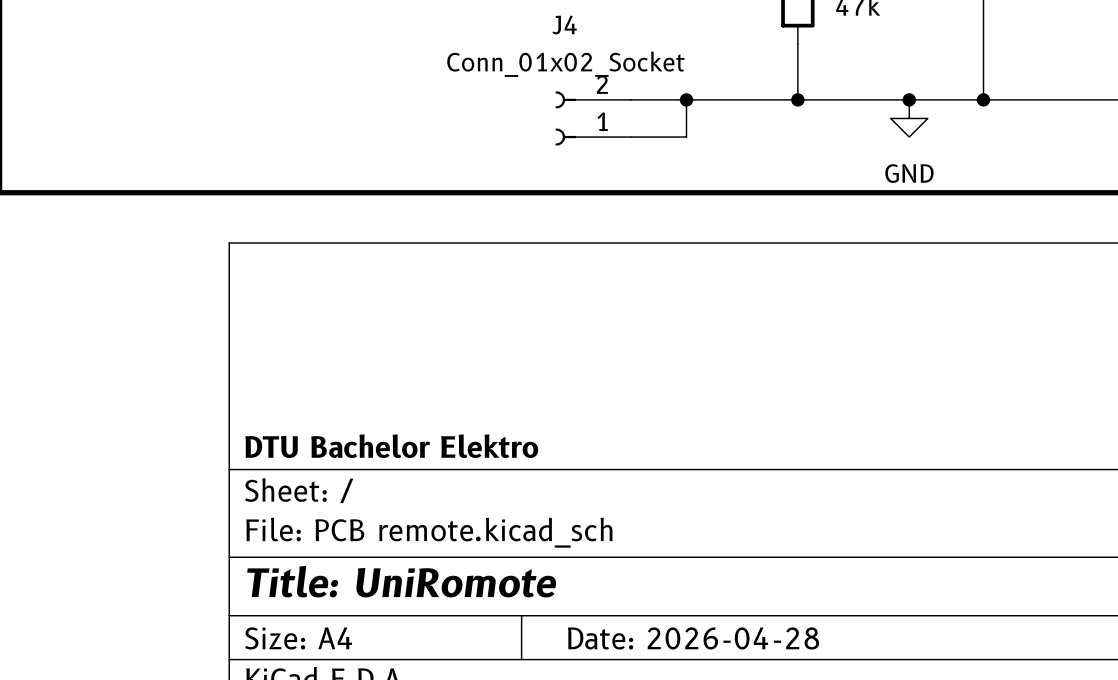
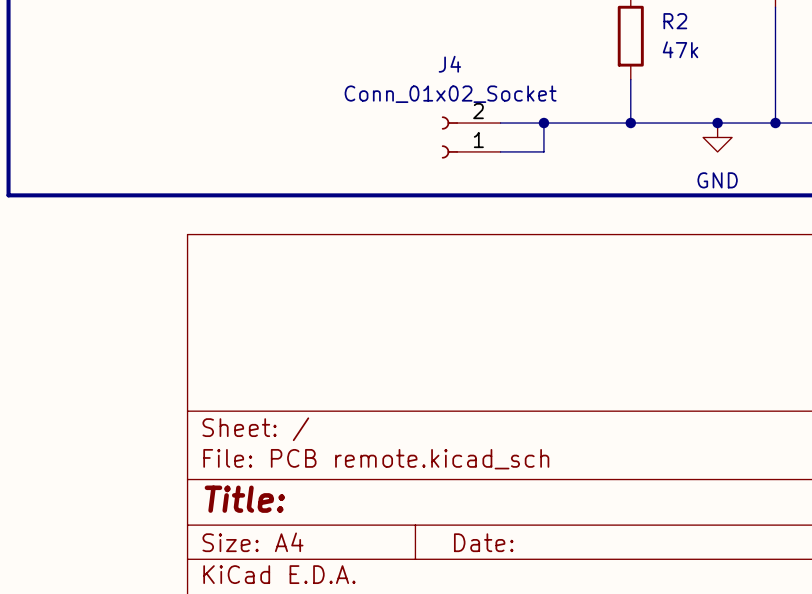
title block: DTU Bachelor Elektro (391, 446) -> none
title block: Title: UniRomote (401, 581) -> Title: (244, 499)
title block: Date: 2026-04-28 (693, 638) -> Date: (483, 542)

